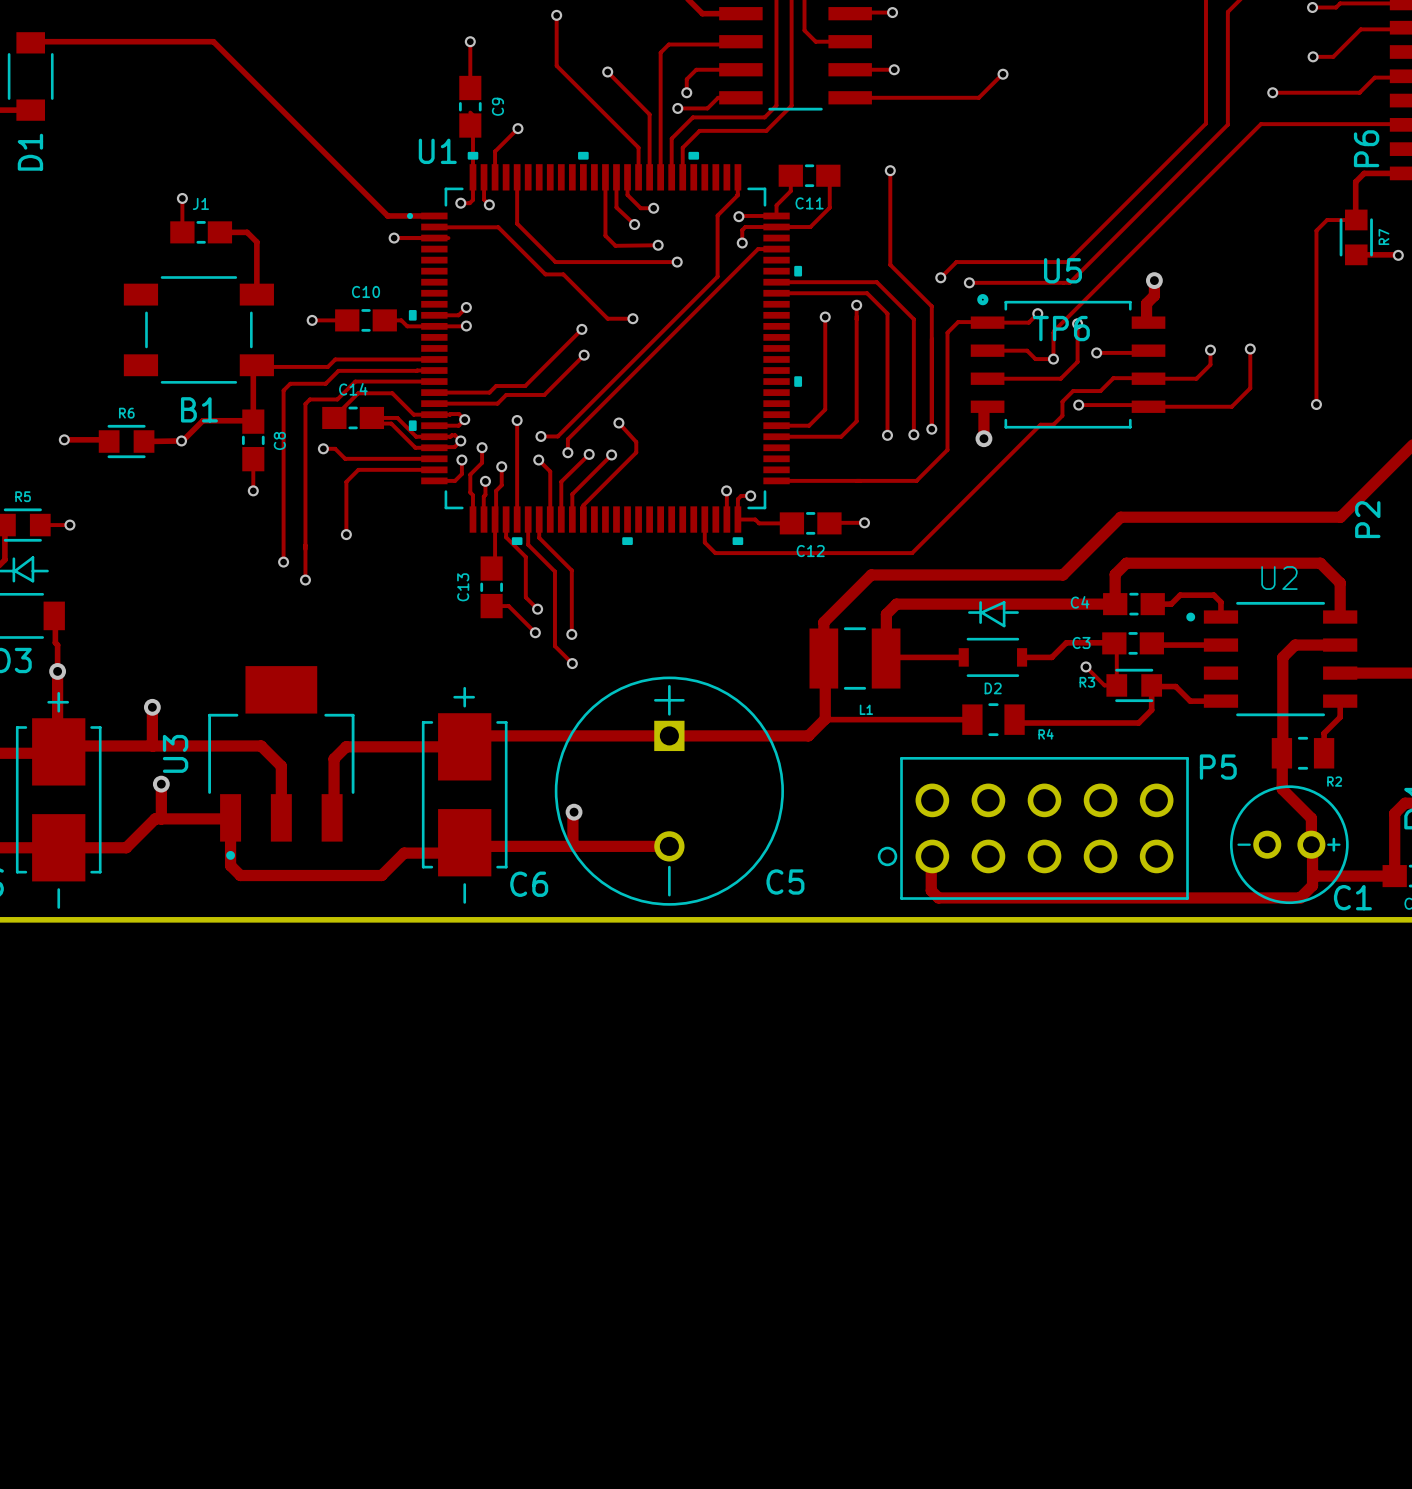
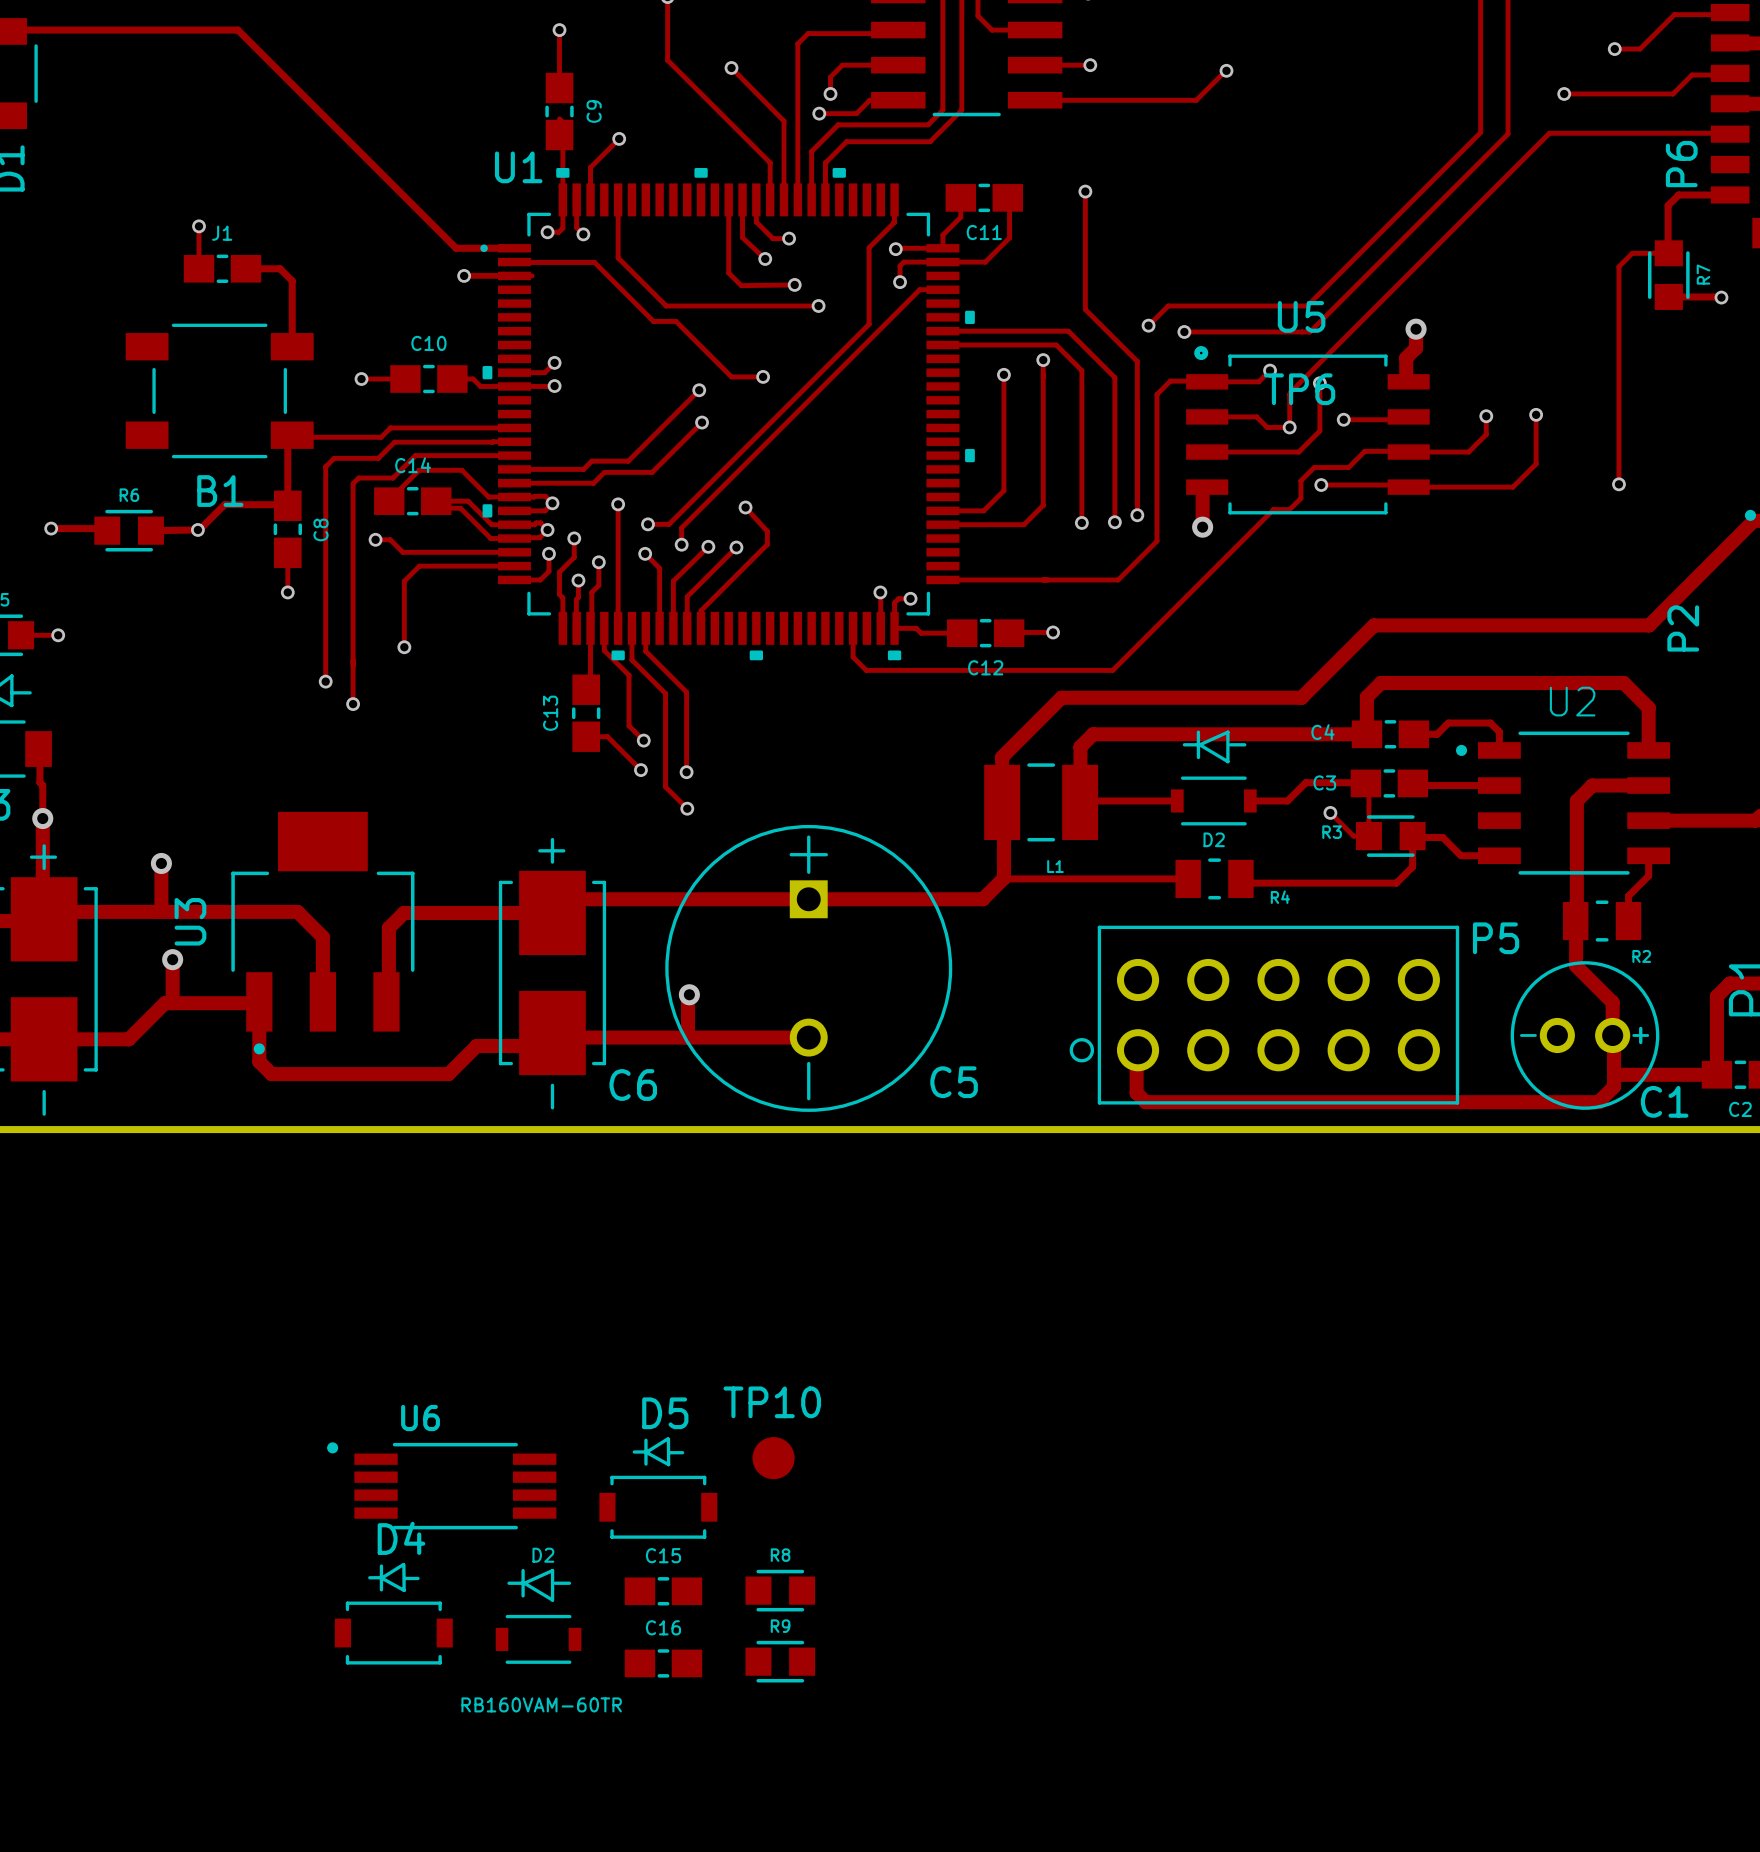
TP10: none -> (773, 1458)
U6: none -> (441, 1485)
D5: none -> (658, 1487)
C15: none -> (663, 1591)
R8: none -> (780, 1590)
D4: none -> (393, 1613)
D2: none -> RB160VAM-60TR (538, 1616)
R9: none -> (780, 1661)
C16: none -> (663, 1663)

